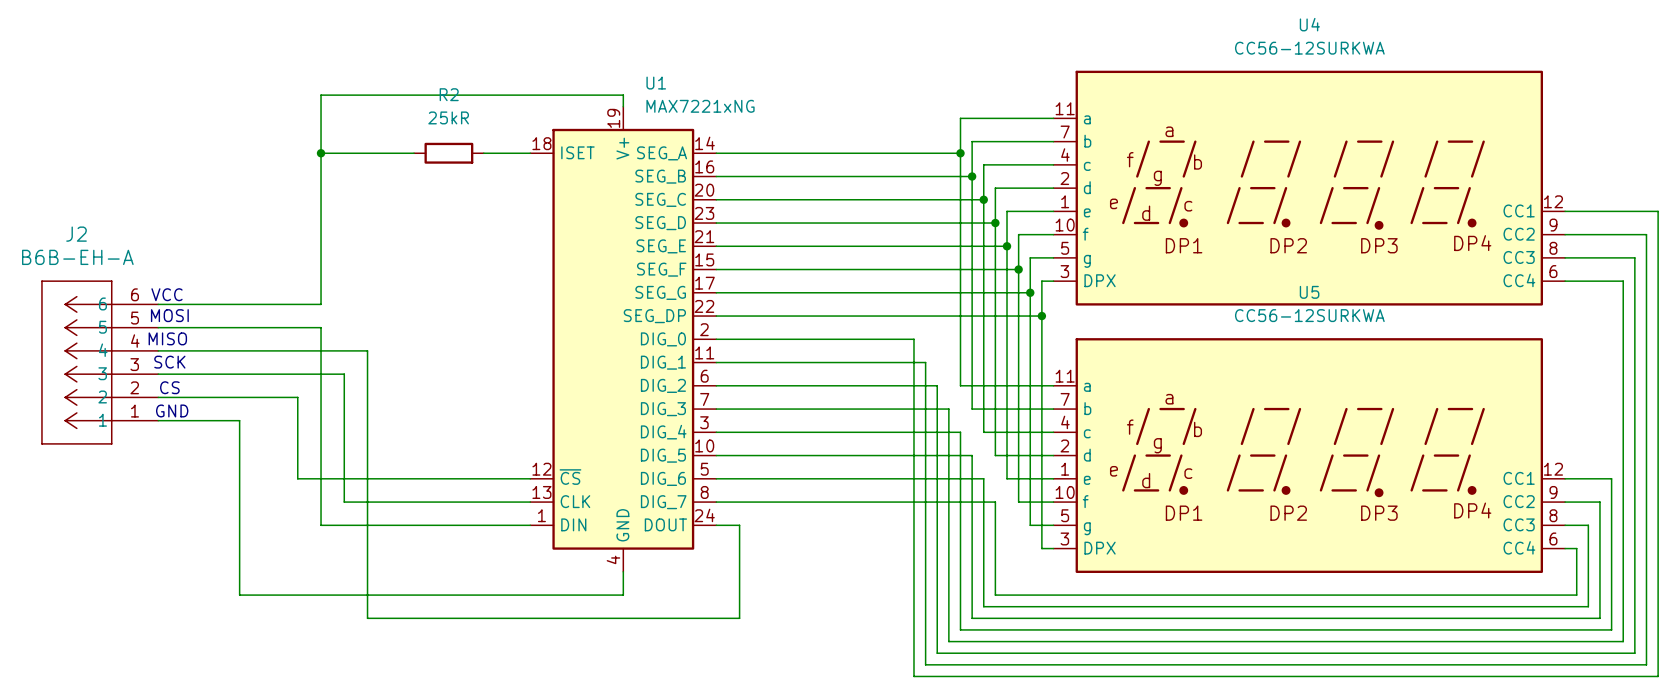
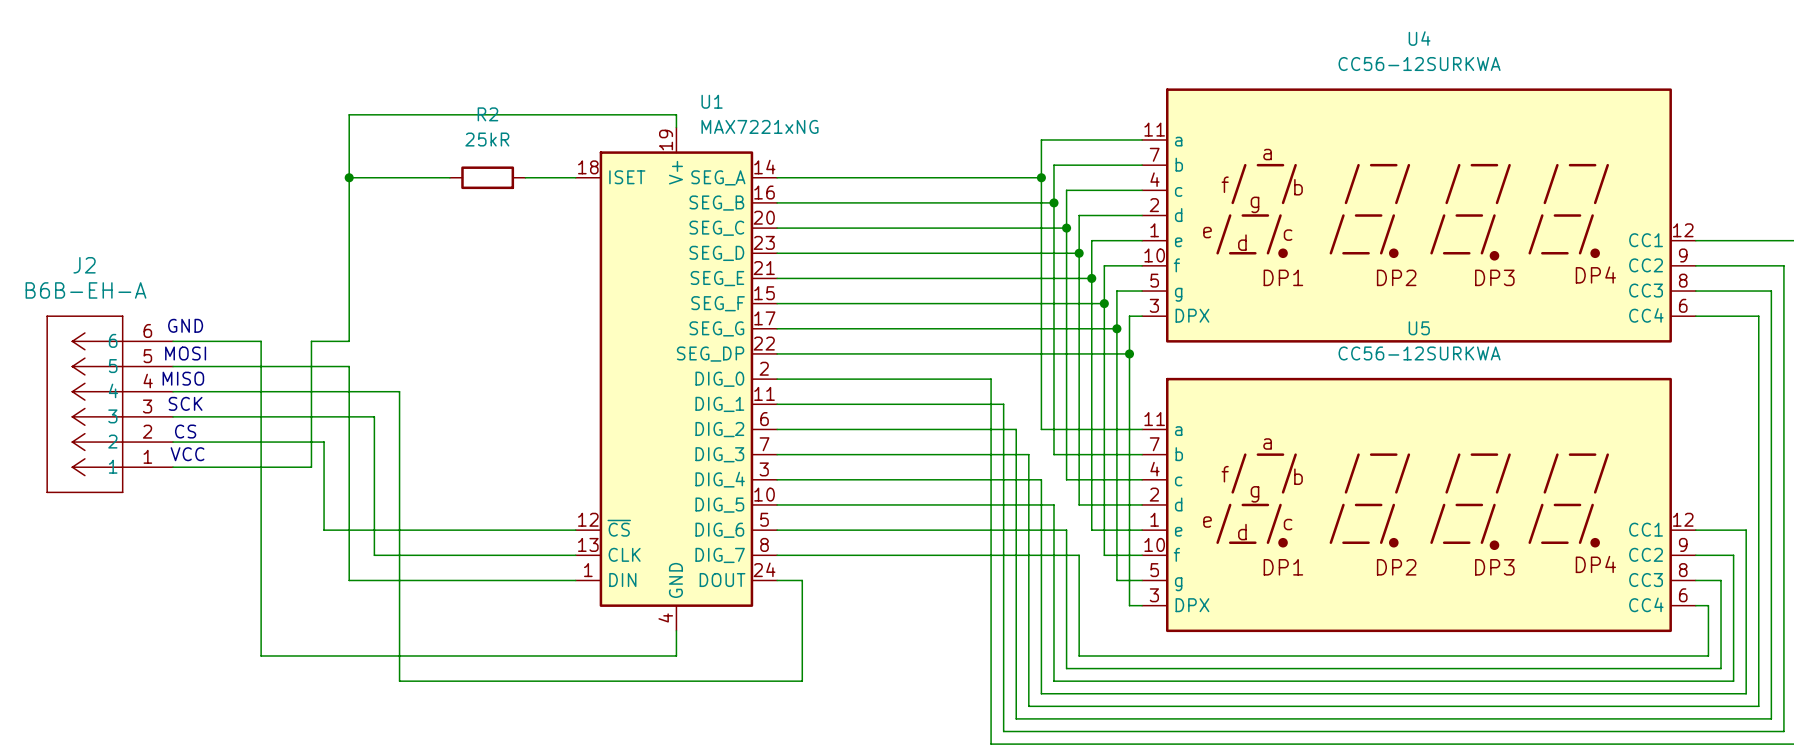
text: VCC (166, 294) -> GND (185, 325)
wire: (239, 304) (286, 304) -> (261, 341) (261, 467) (311, 467) (311, 341)
text: GND (172, 410) -> VCC (187, 454)

